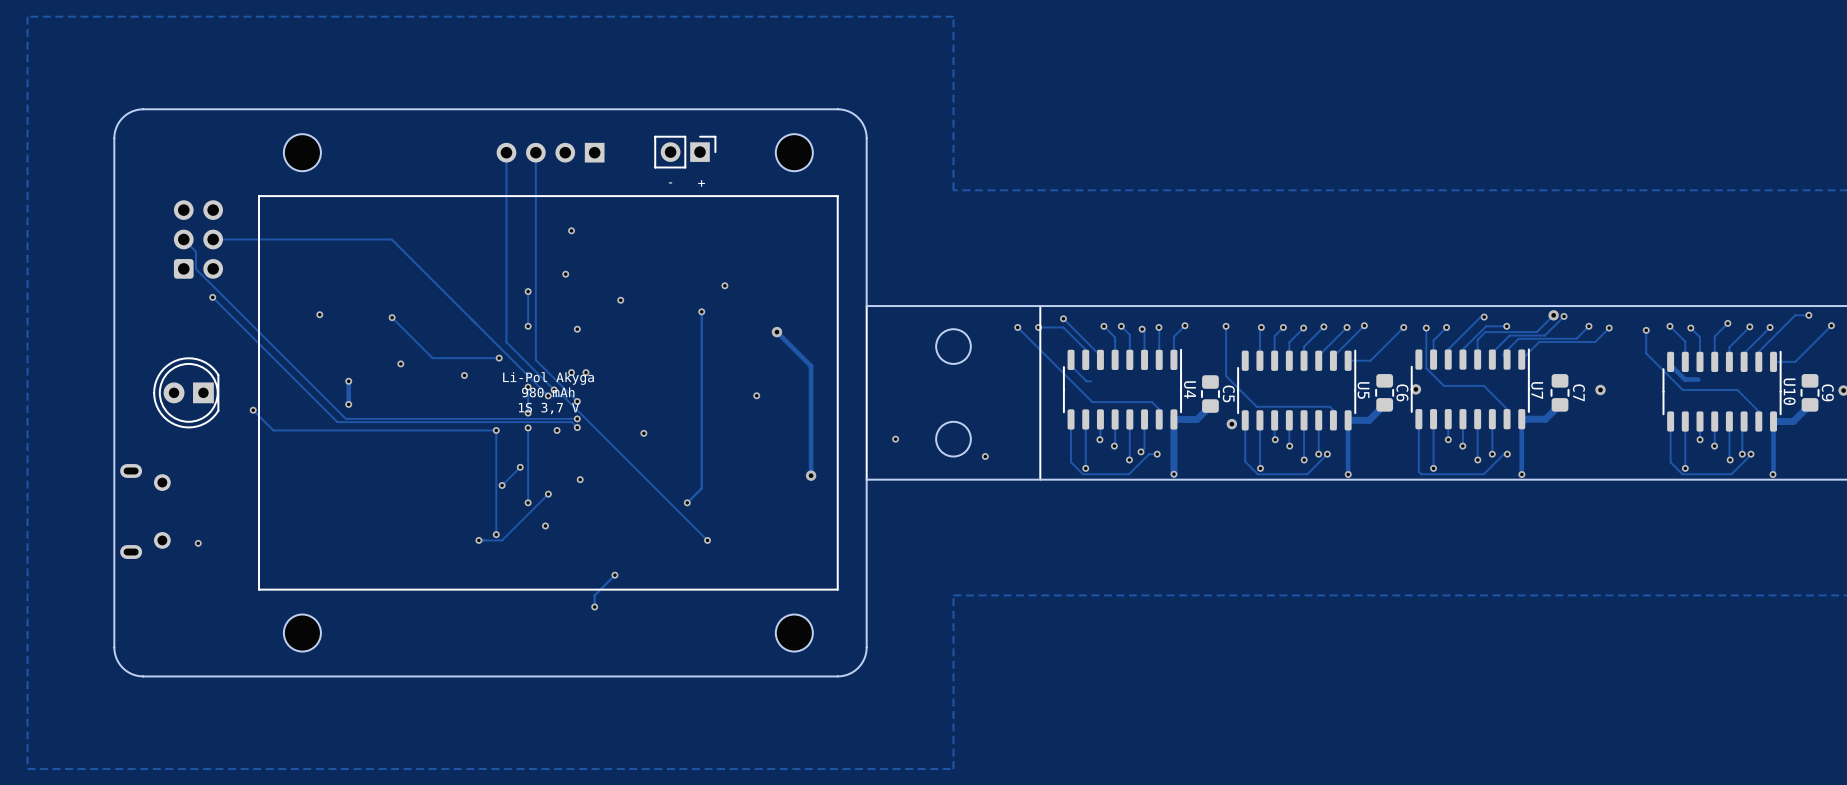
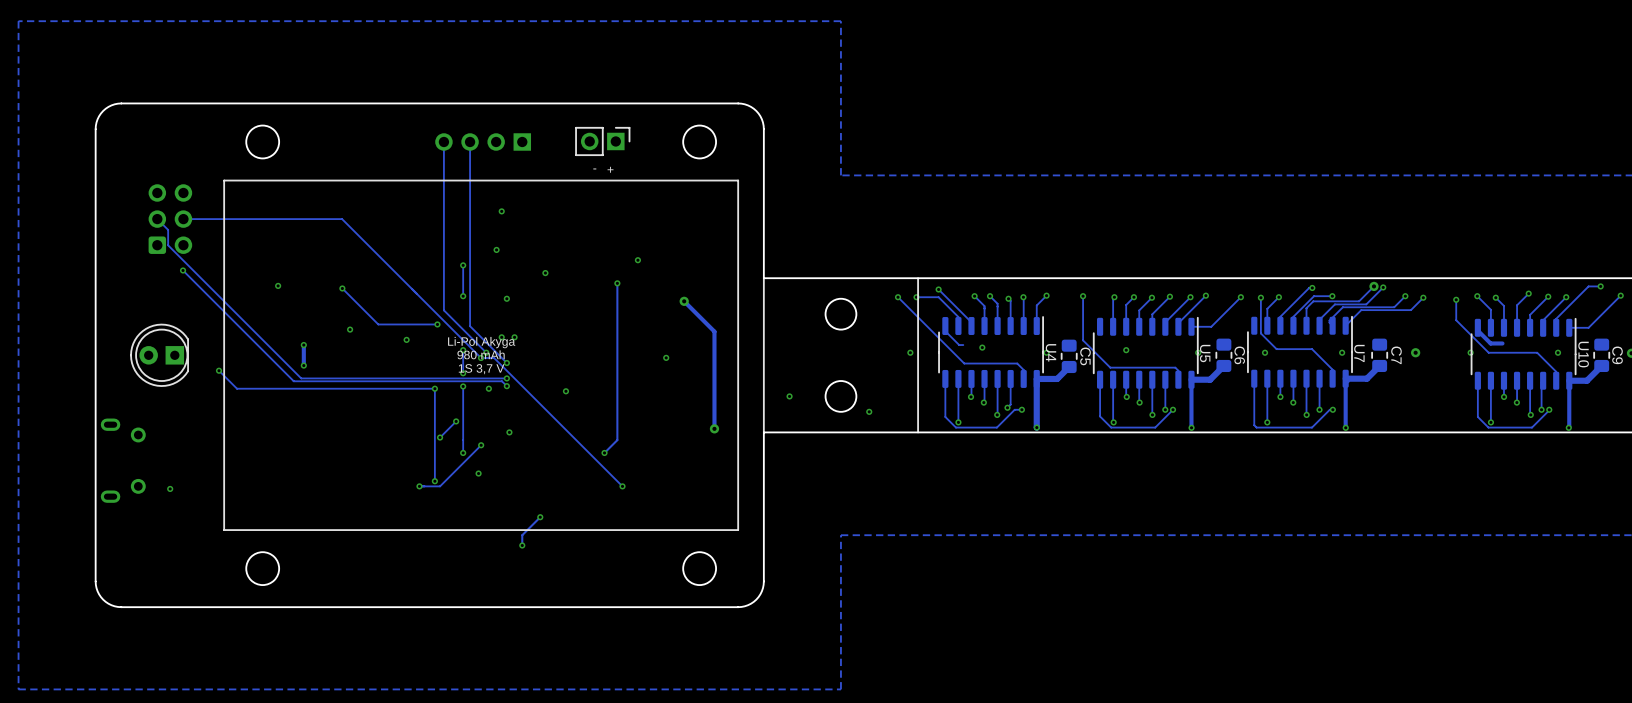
via: none -> (982, 347)
via: none -> (1126, 350)
via: none -> (910, 352)
via: none -> (1046, 352)
via: none -> (1198, 352)
via: (1415, 389) -> none
via: none -> (1265, 352)
via: none -> (1342, 352)
via: none -> (1470, 352)
via: none -> (1558, 352)
via: (1231, 424) -> none

